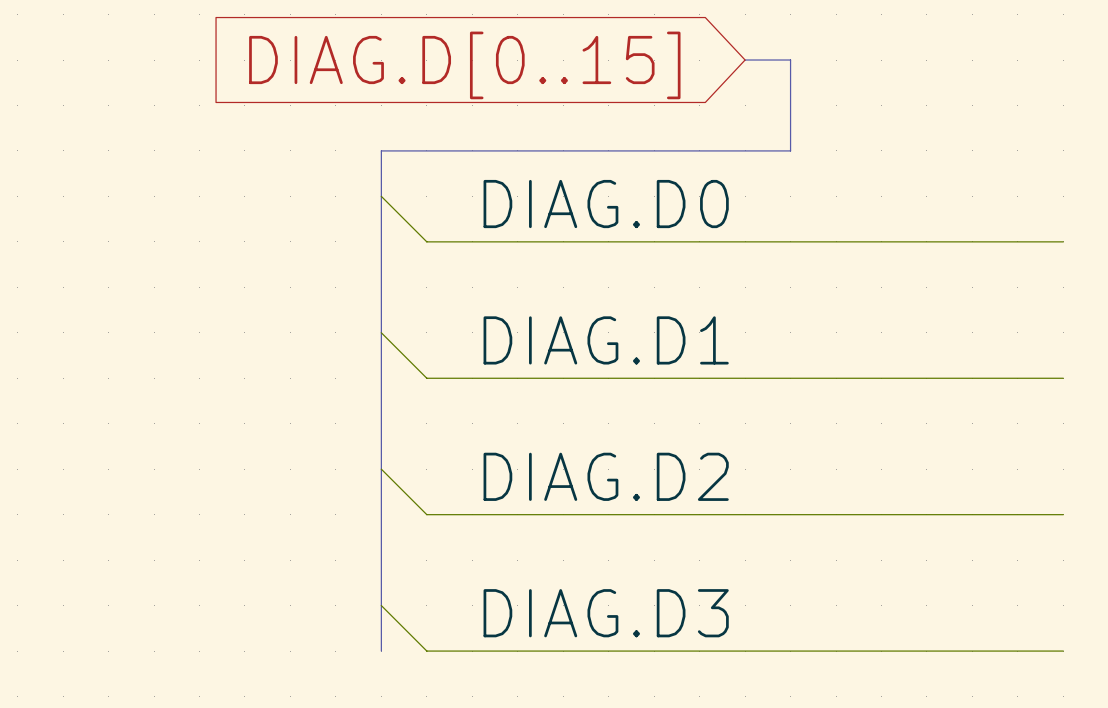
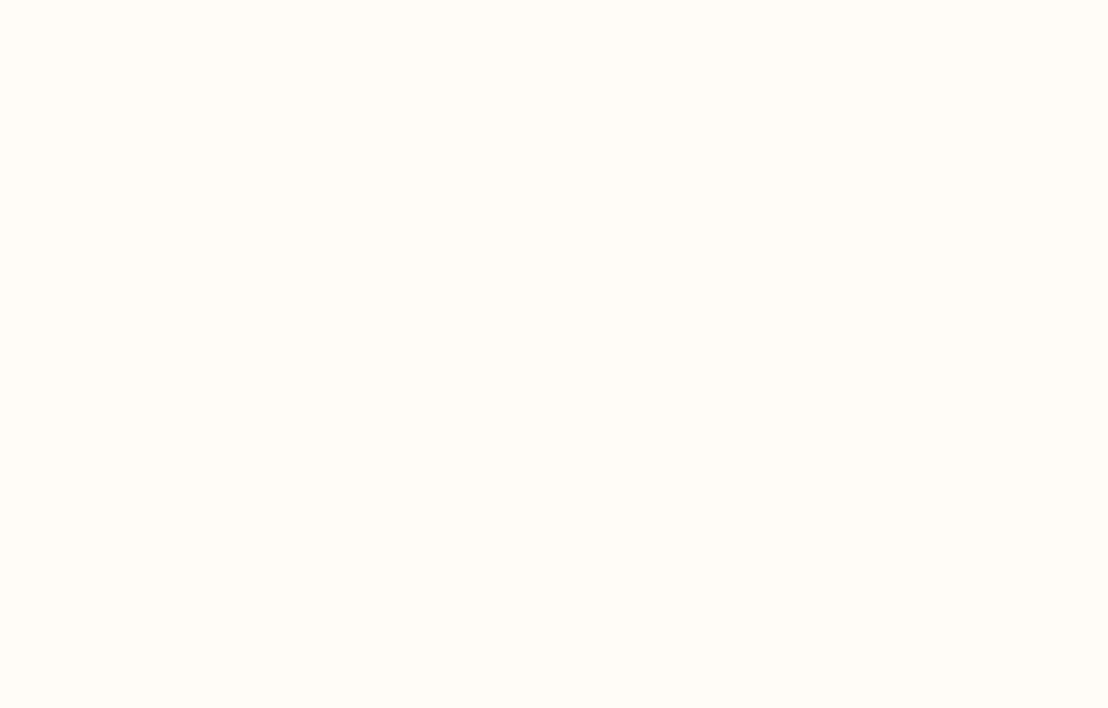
bus: (745, 60) (790, 60) (790, 150) (381, 150) (381, 651) -> none
global label: DIAG.D[0..15] (464, 65) -> none
wire: (381, 196) (426, 241) (1063, 241) -> none
label: DIAG.D0 (606, 204) -> none
wire: (381, 332) (426, 378) (1063, 378) -> none
label: DIAG.D1 (606, 340) -> none
wire: (381, 469) (426, 514) (1063, 514) -> none
label: DIAG.D2 (606, 476) -> none
wire: (381, 605) (426, 651) (1063, 651) -> none
label: DIAG.D3 (606, 613) -> none

